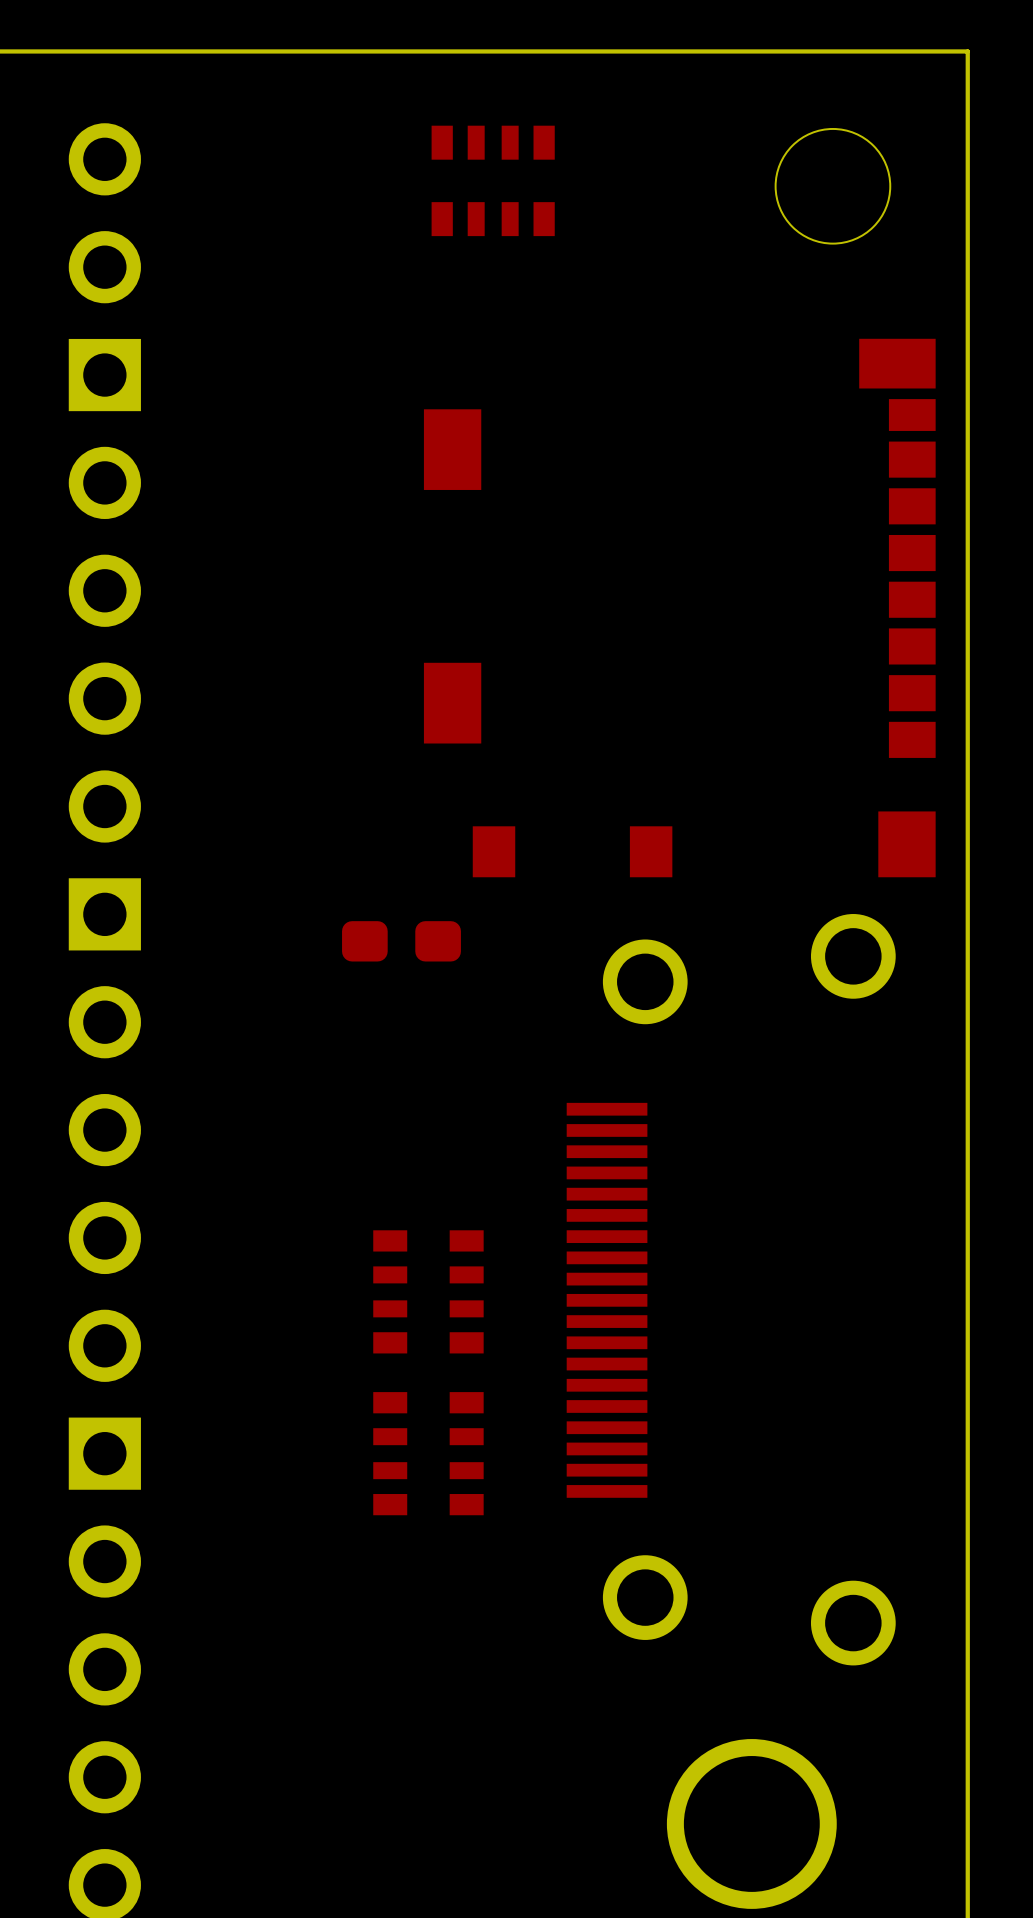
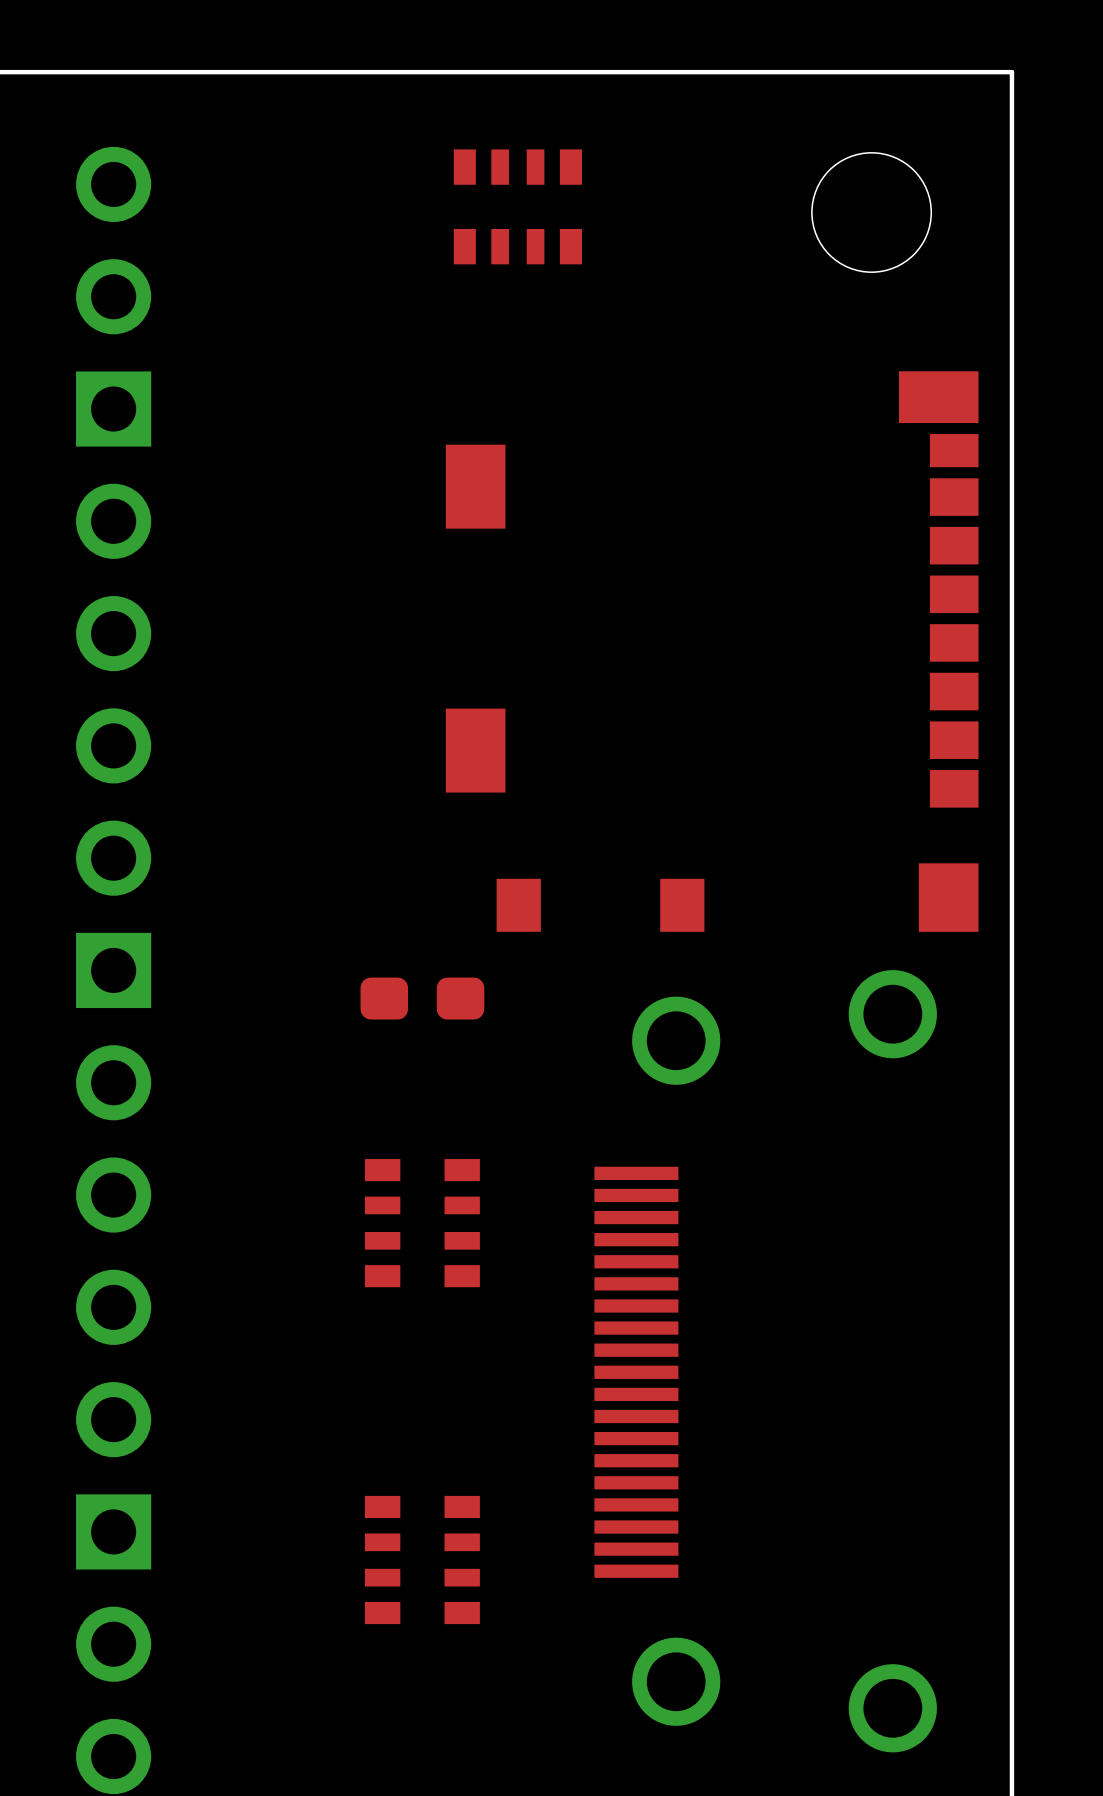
part position: (428, 1291) -> (422, 1223)
part position: (428, 1453) -> (422, 1559)

